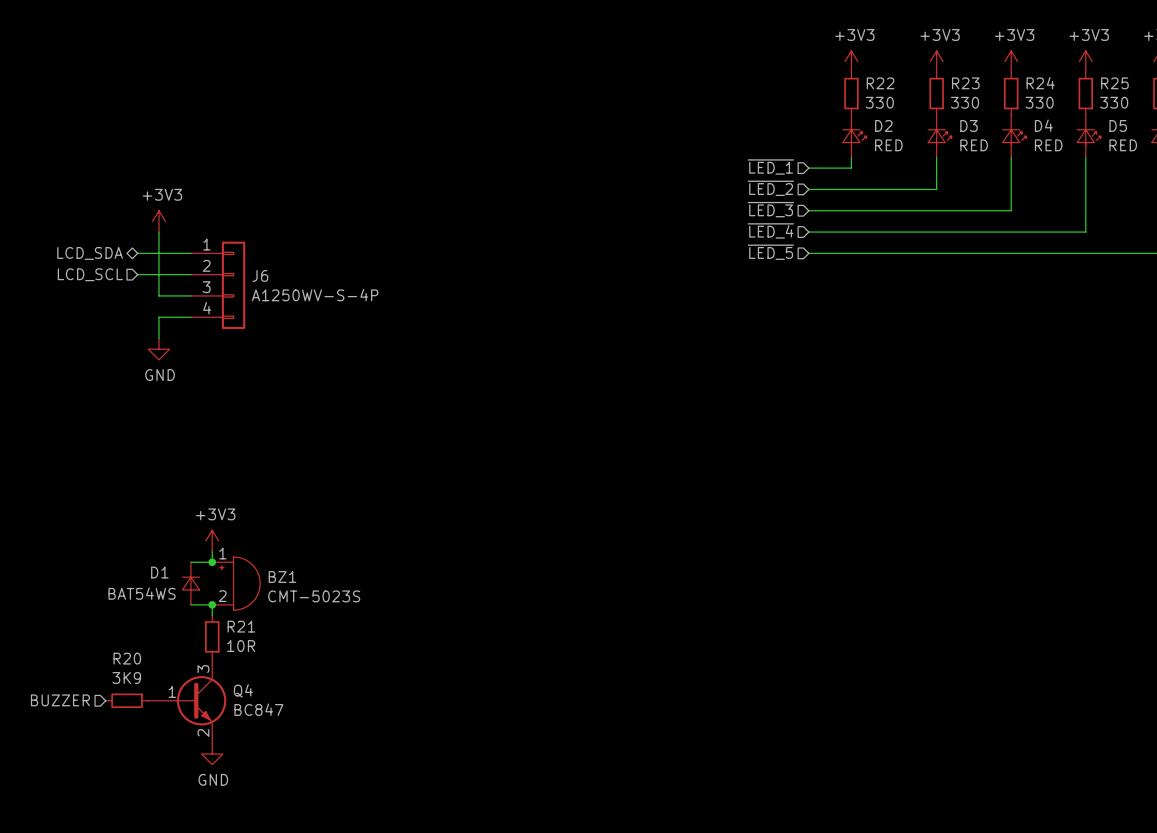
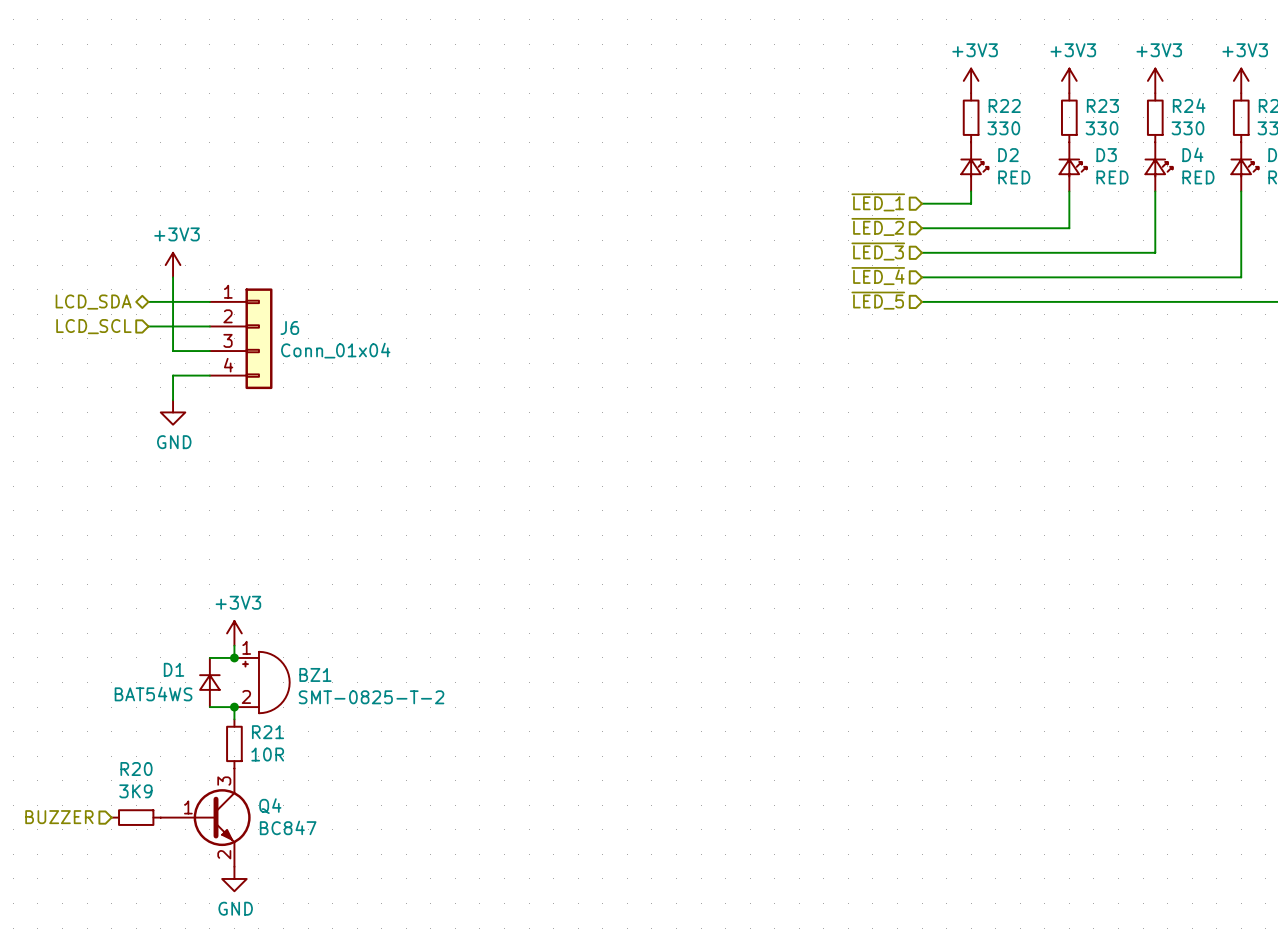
J6 value: A1250WV-S-4P (315, 295) -> Conn_01x04 (335, 350)
BZ1 value: CMT-5023S (314, 596) -> SMT-0825-T-2 (371, 697)

